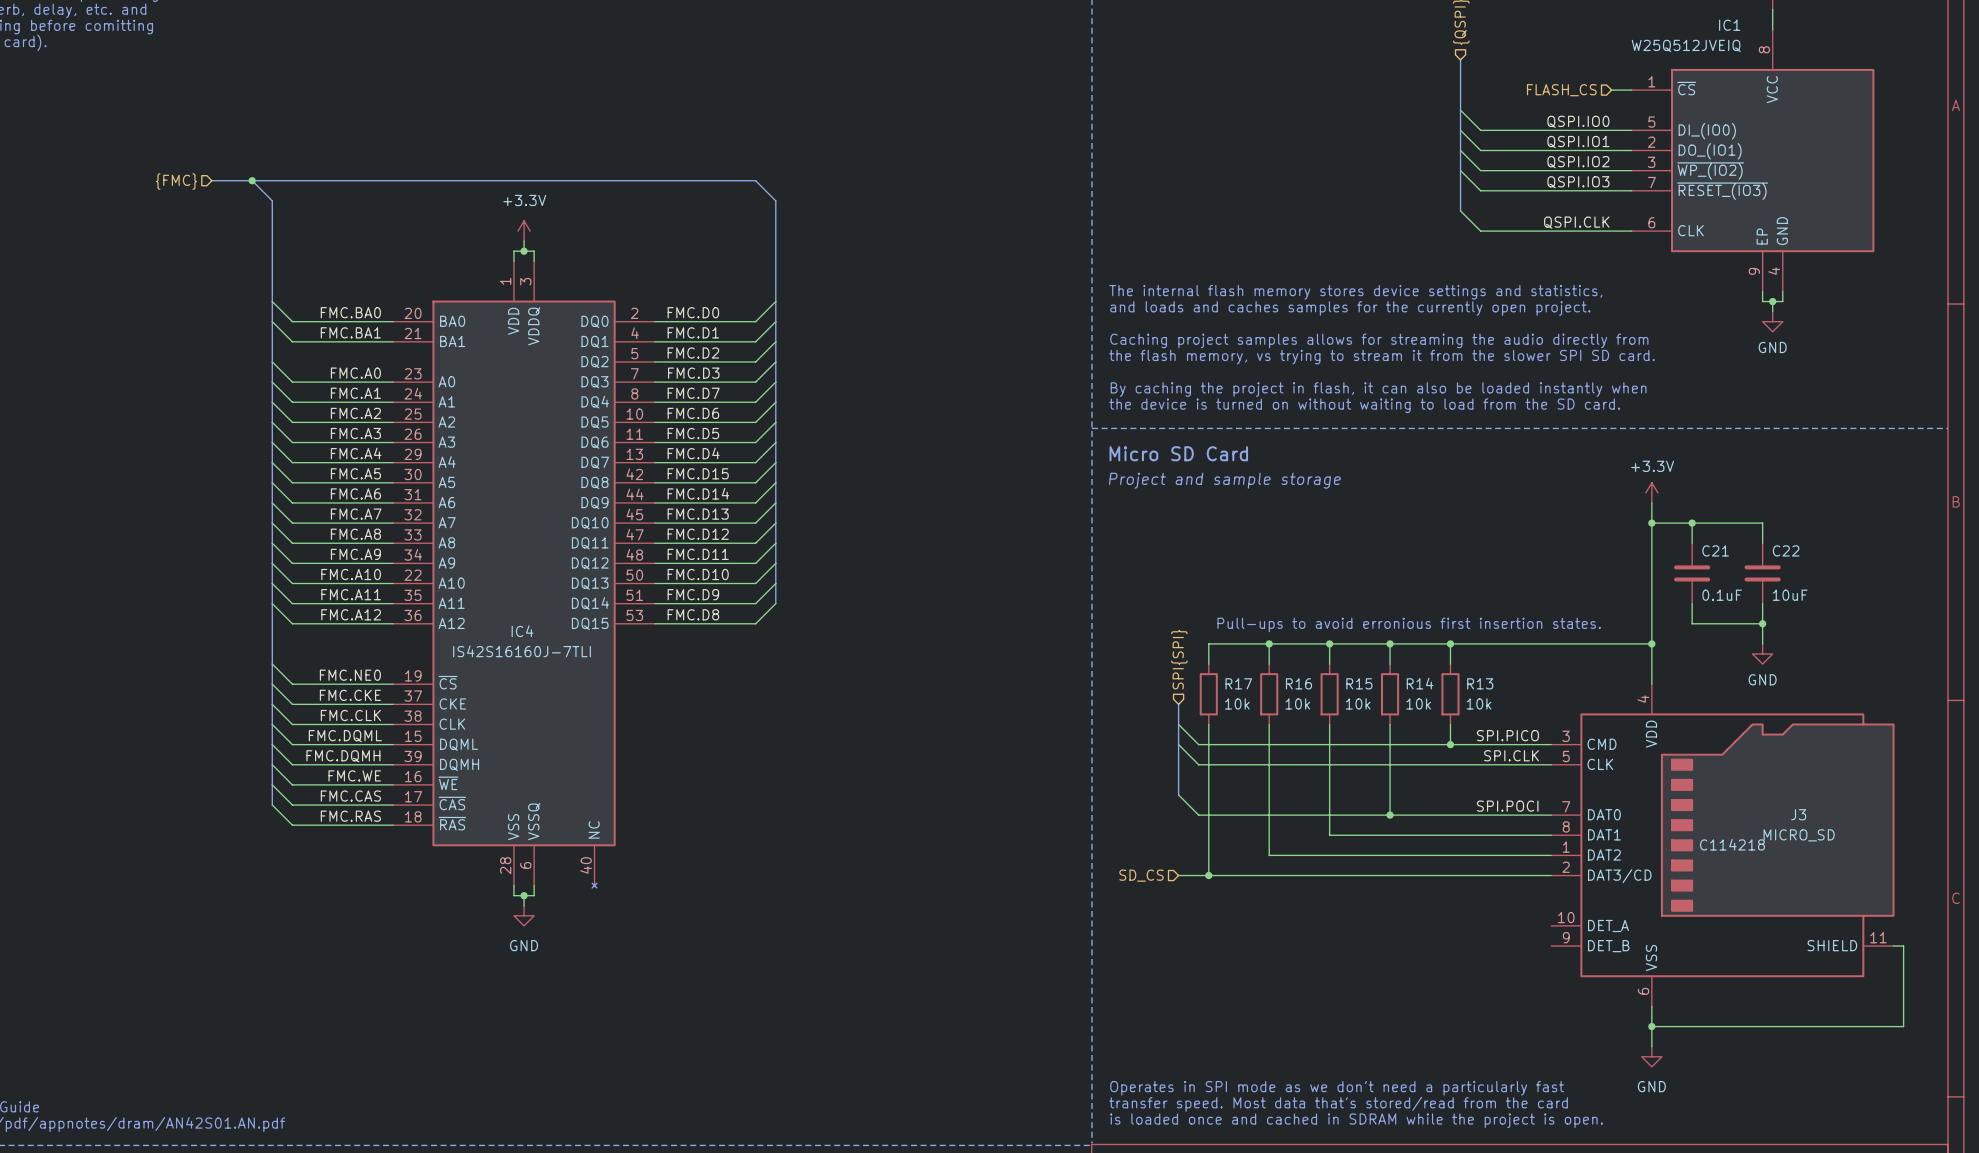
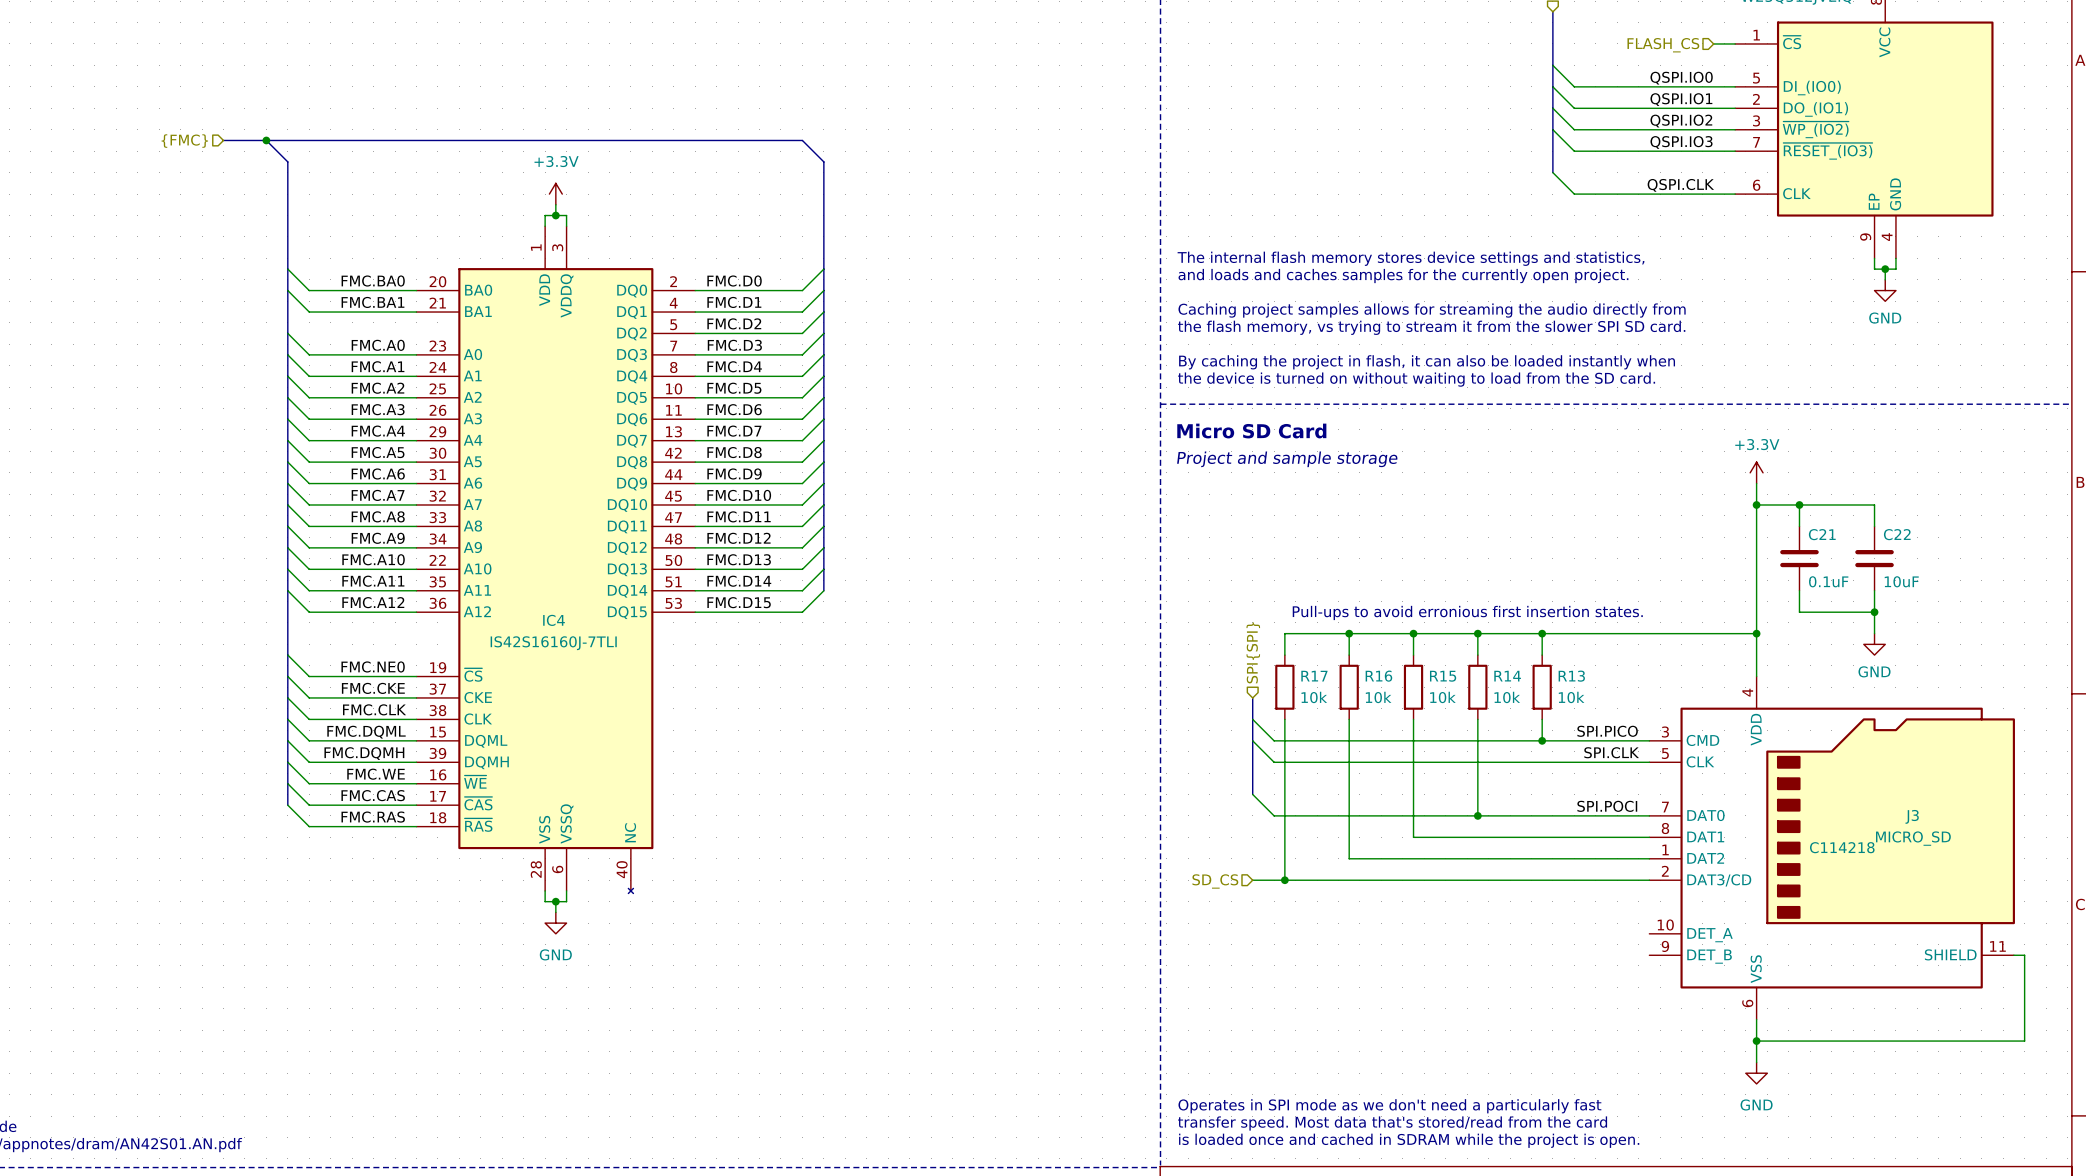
label: FMC.D7 (693, 393) -> FMC.D4 (734, 366)
label: FMC.D6 (693, 413) -> FMC.D5 (734, 388)
label: FMC.D5 (693, 433) -> FMC.D6 (734, 409)
label: FMC.D4 (693, 453) -> FMC.D7 (734, 431)
label: FMC.D15 (698, 473) -> FMC.D8 (734, 452)
label: FMC.D14 (698, 493) -> FMC.D9 (734, 473)
label: FMC.D13 (698, 514) -> FMC.D10 (739, 495)
label: FMC.D12 (698, 534) -> FMC.D11 (739, 516)
label: FMC.D11 (698, 554) -> FMC.D12 (738, 538)
label: FMC.D10 (698, 574) -> FMC.D13 (739, 559)
label: FMC.D9 (693, 594) -> FMC.D14 (739, 581)
label: FMC.D8 (693, 614) -> FMC.D15 (739, 602)

